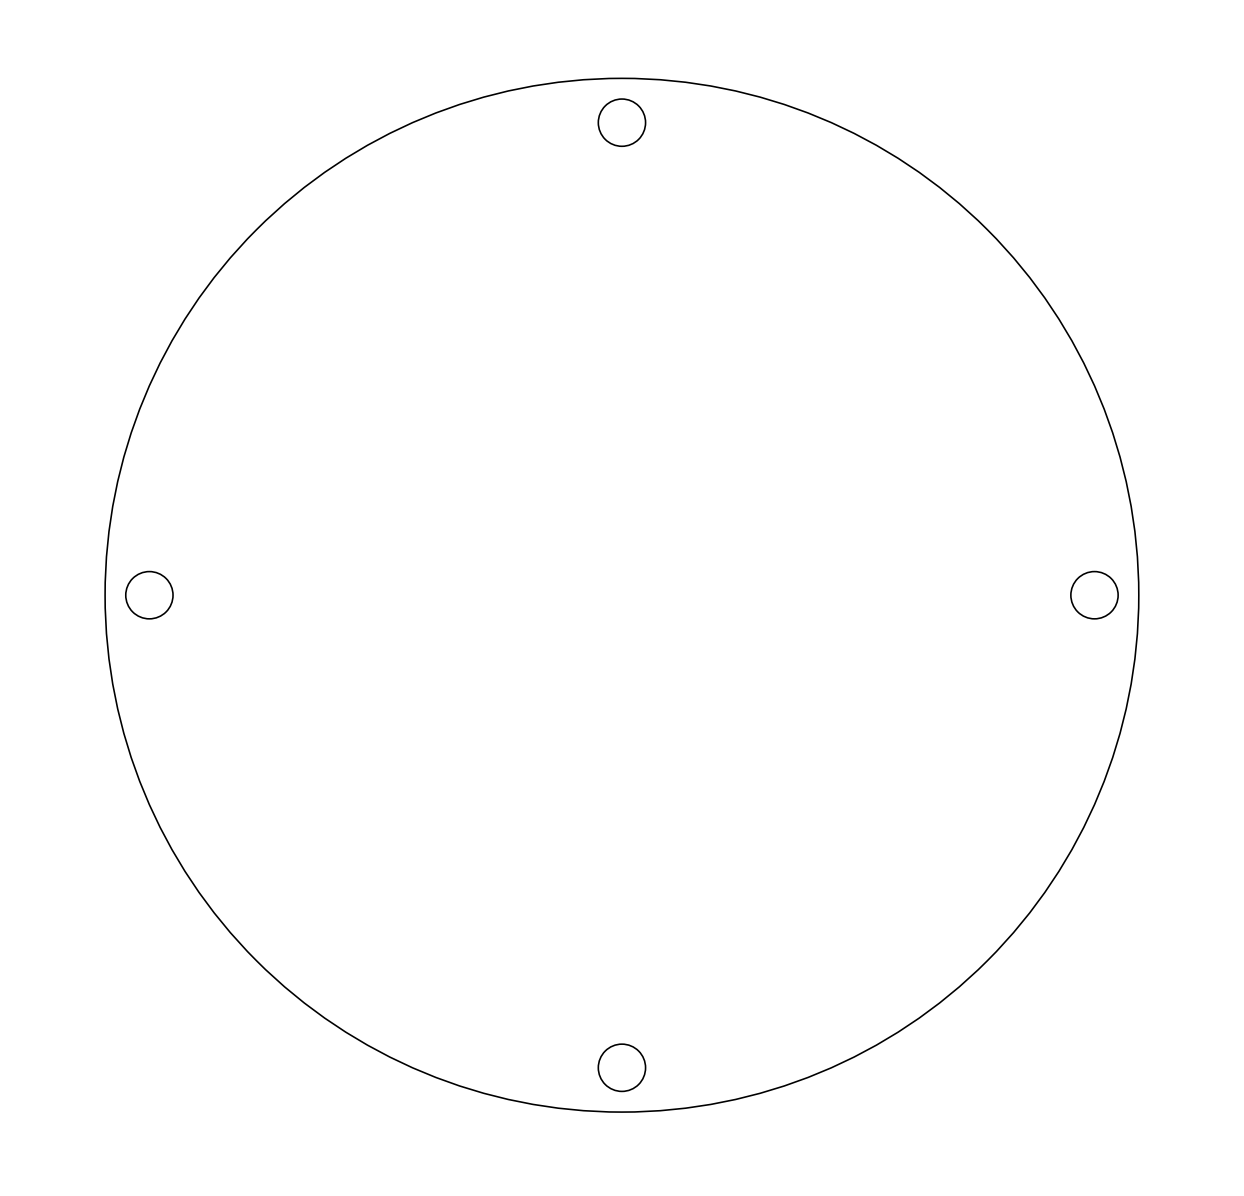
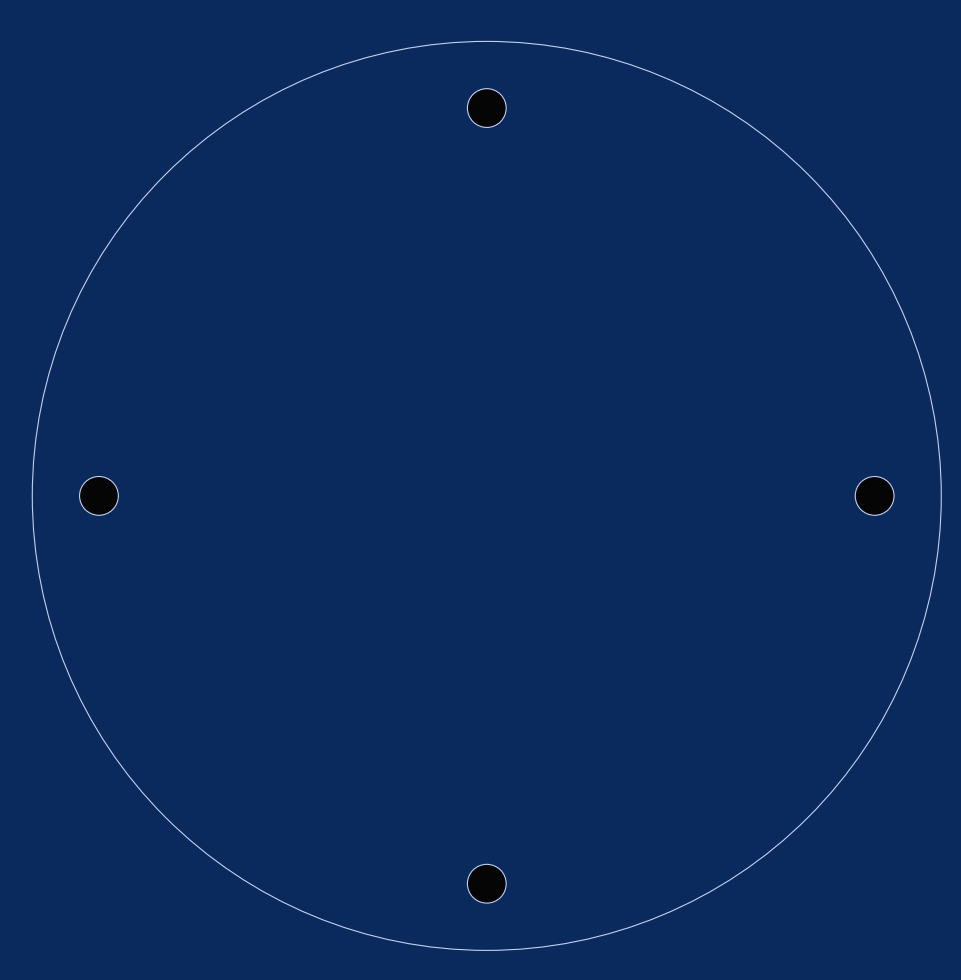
round board edge size: [104, 77, 1140, 1113] -> [31, 41, 942, 951]

